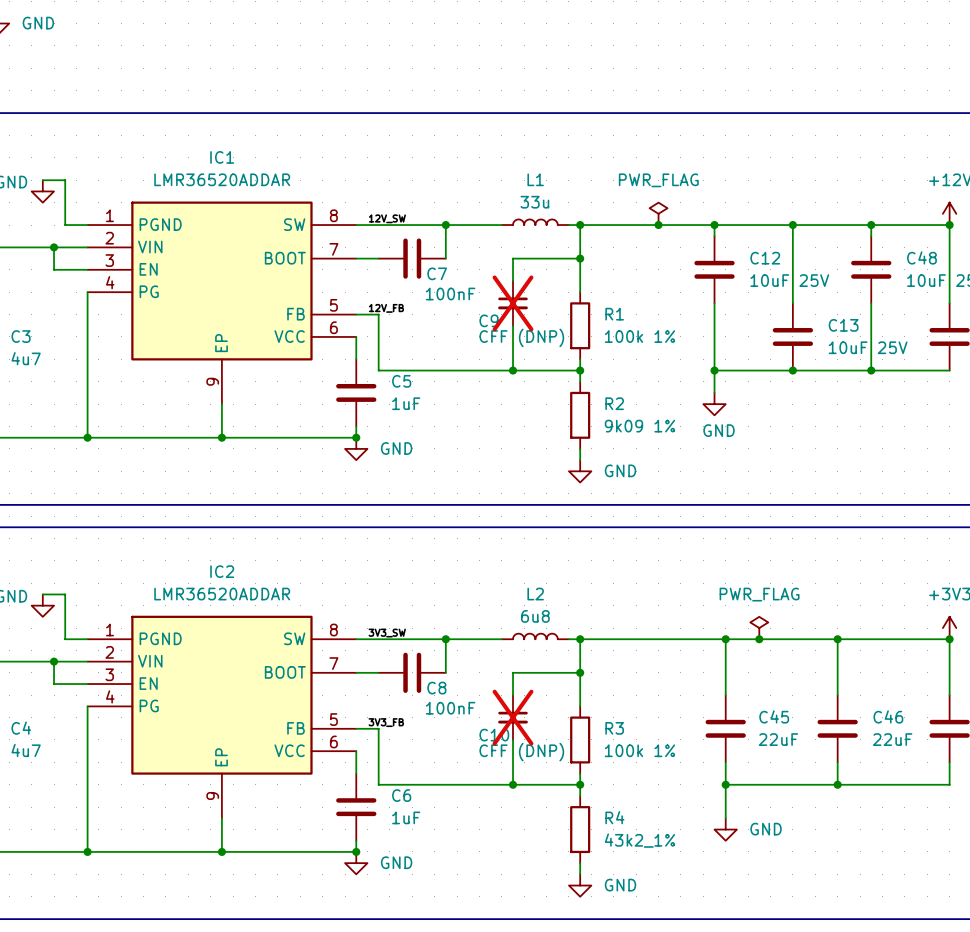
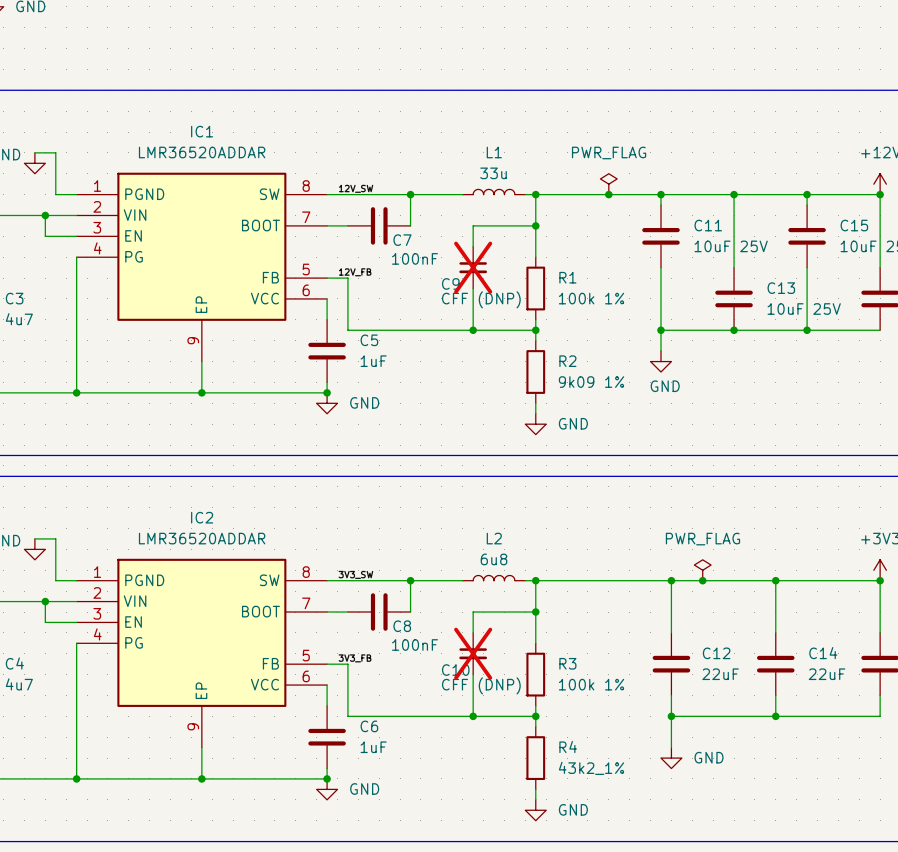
C48 name: C48 (921, 257) -> C15 (854, 225)
C12 name: C12 (765, 258) -> C11 (708, 225)
C45 name: C45 (774, 716) -> C12 (716, 653)
C46 name: C46 (888, 716) -> C14 (823, 653)

